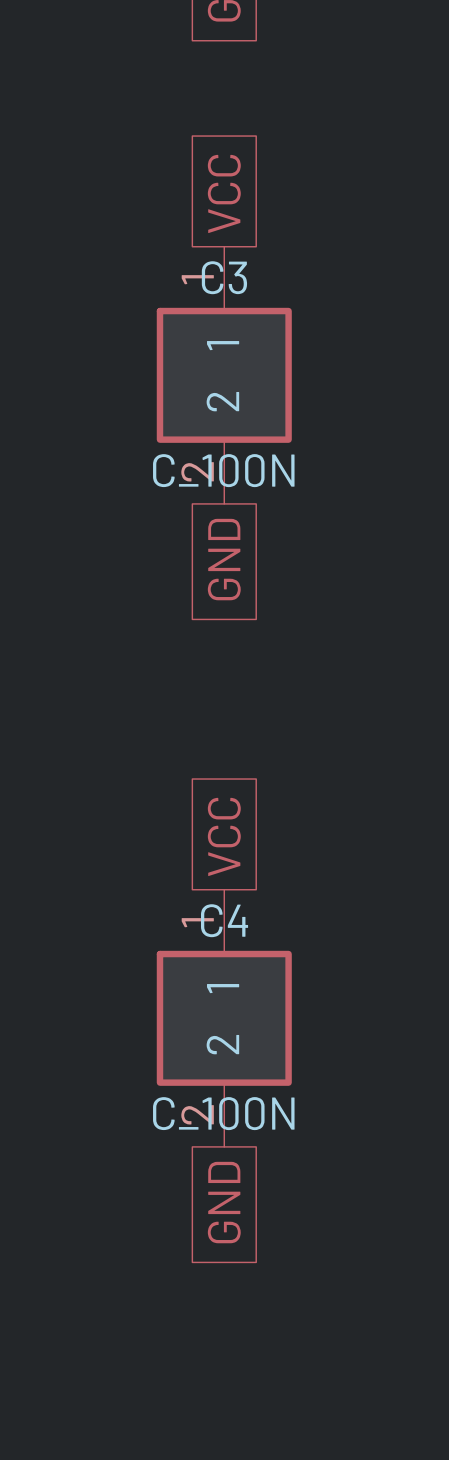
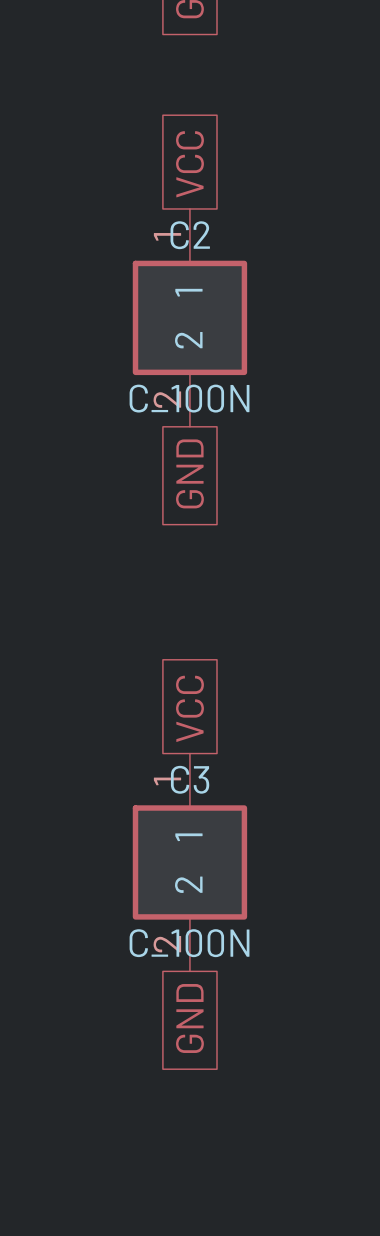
C3 name: C3 (224, 277) -> C2 (190, 235)
C4 name: C4 (224, 920) -> C3 (190, 779)

